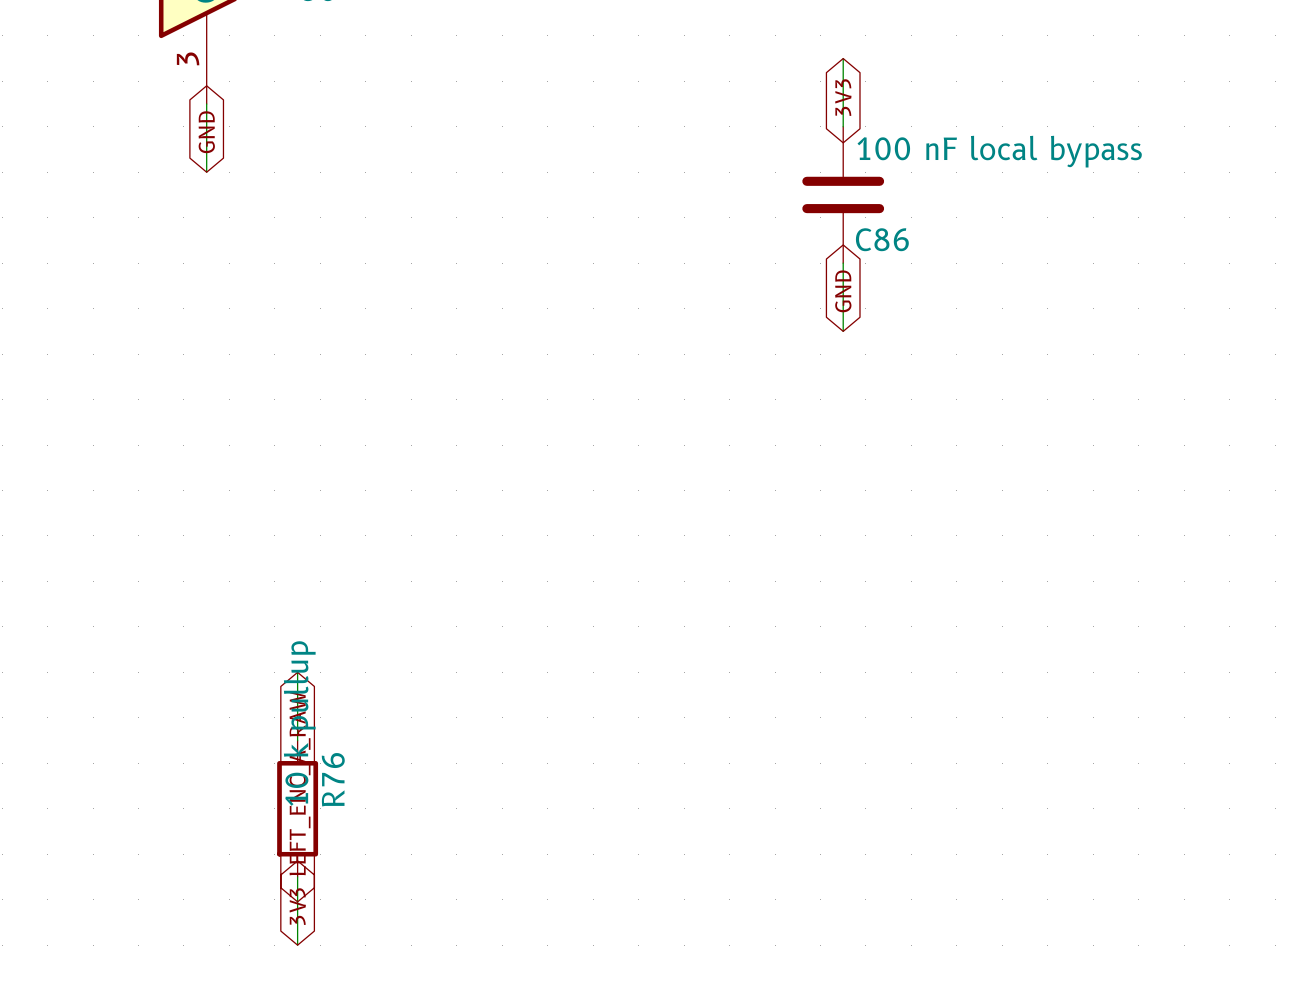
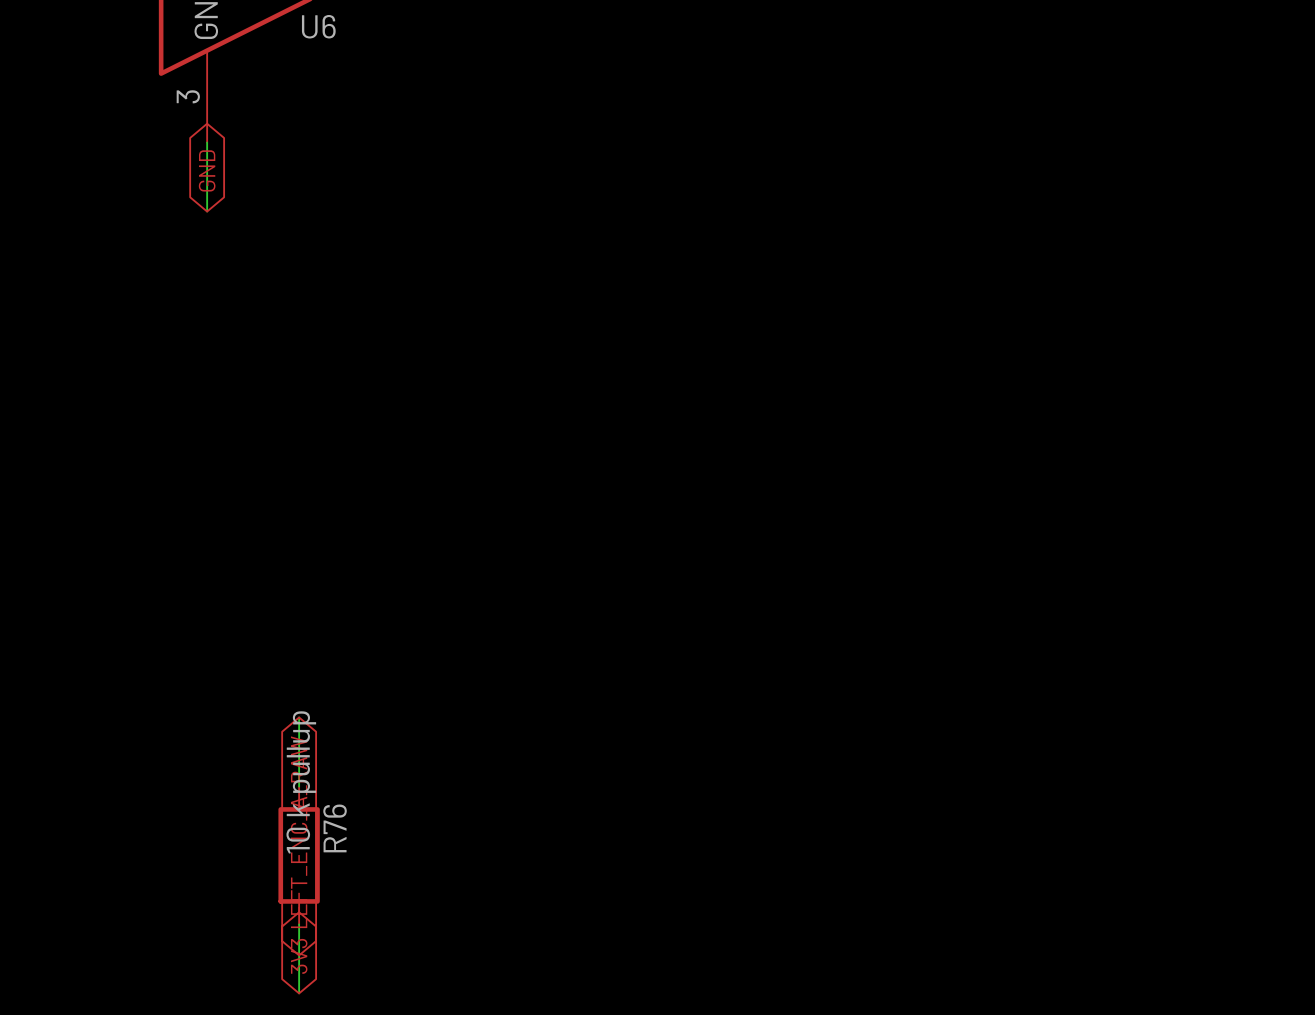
wire: (843, 58) (843, 126) -> none
global label: 3V3 (843, 97) -> none
C86: 100 nF local bypass (843, 194) -> none
wire: (843, 263) (843, 331) -> none
global label: GND (843, 291) -> none

